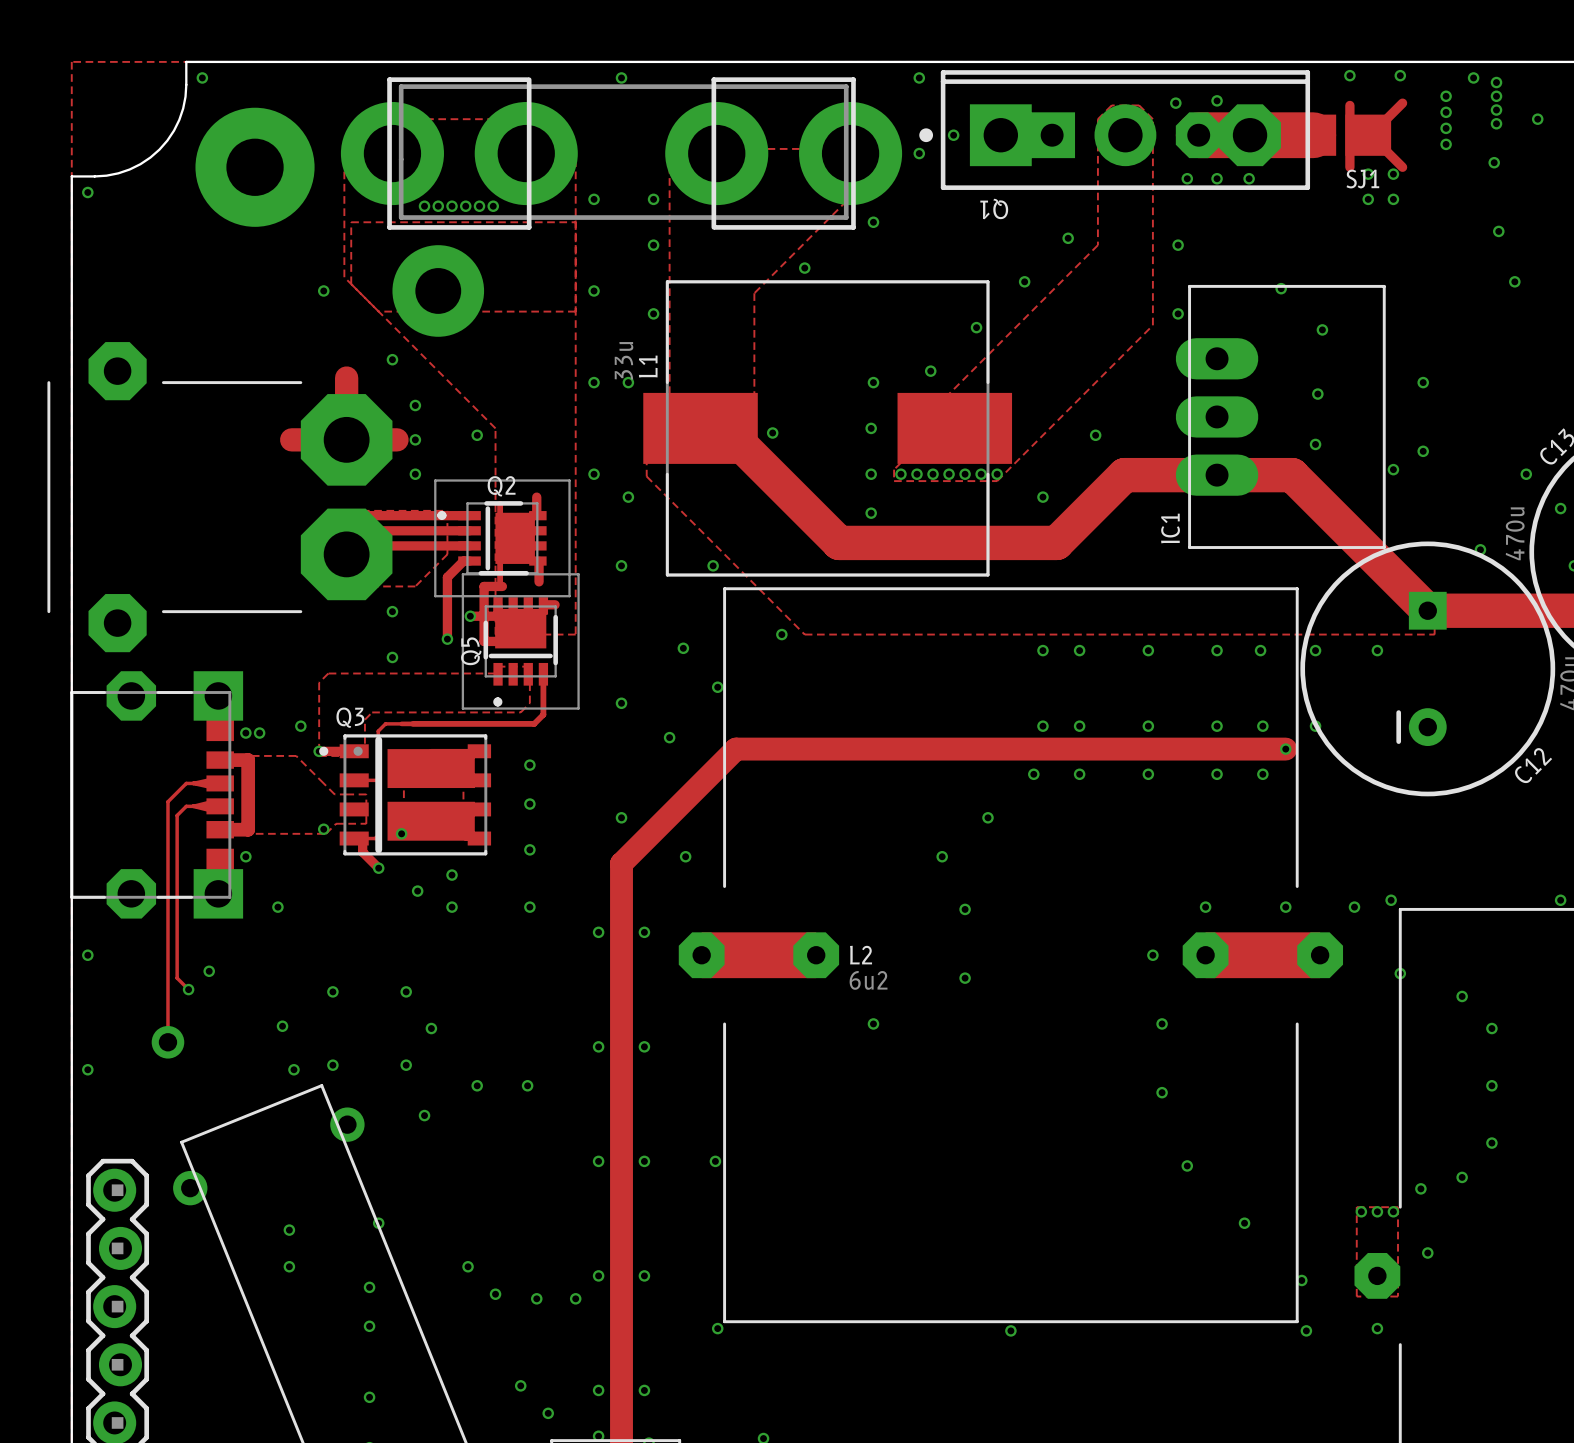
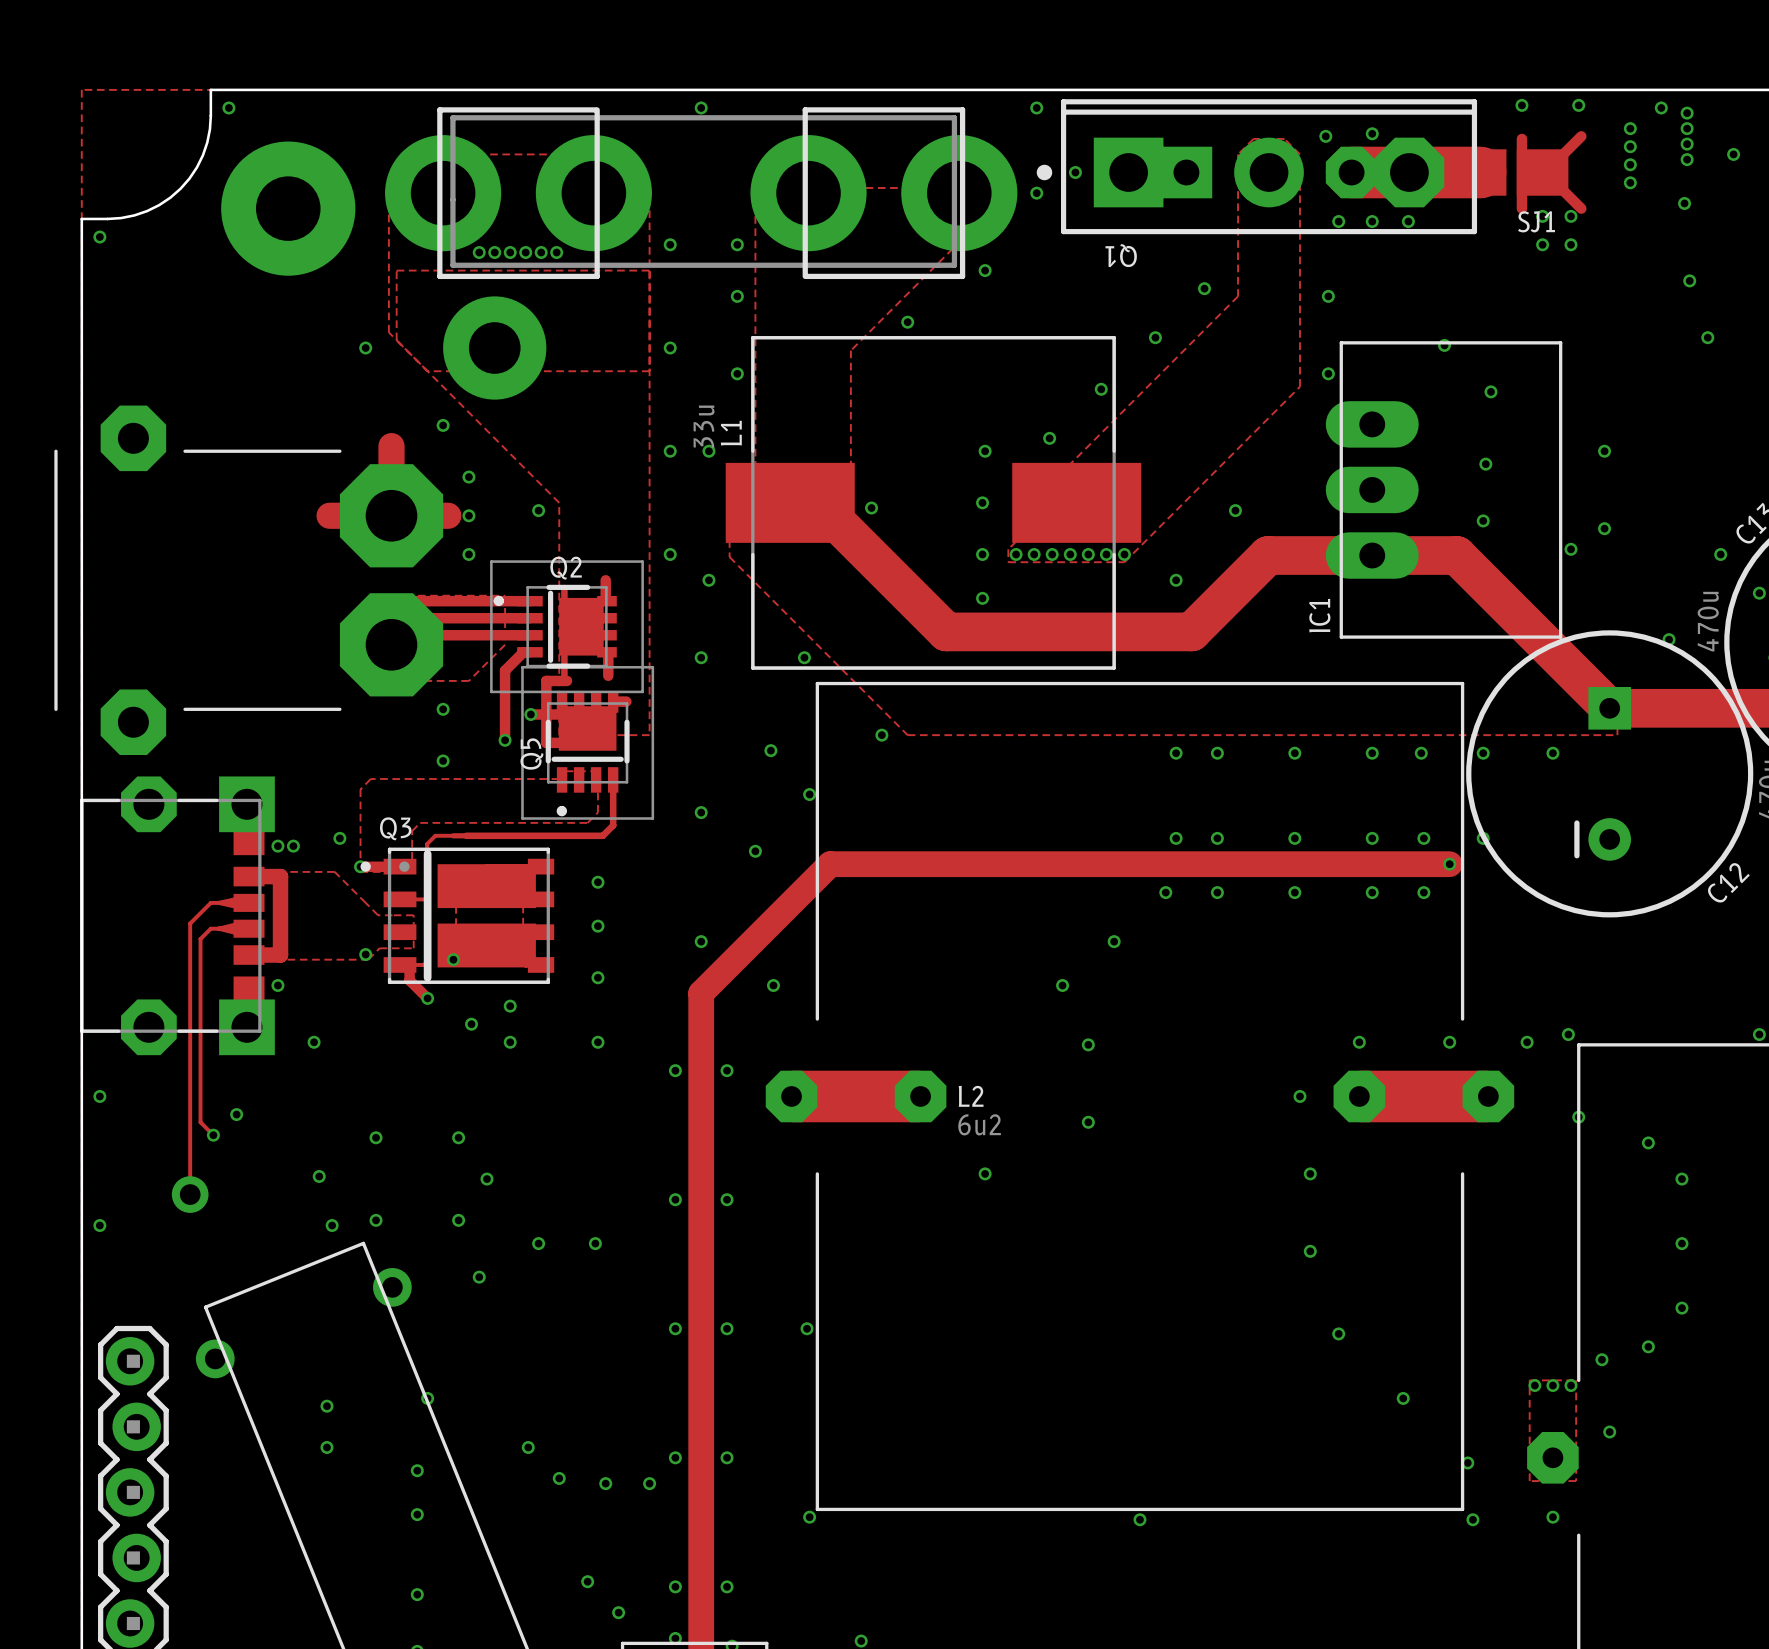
Q2 footprint: [434, 479, 571, 598] -> [490, 560, 644, 694]
Q5 footprint: [461, 573, 580, 710] -> [521, 665, 655, 820]

